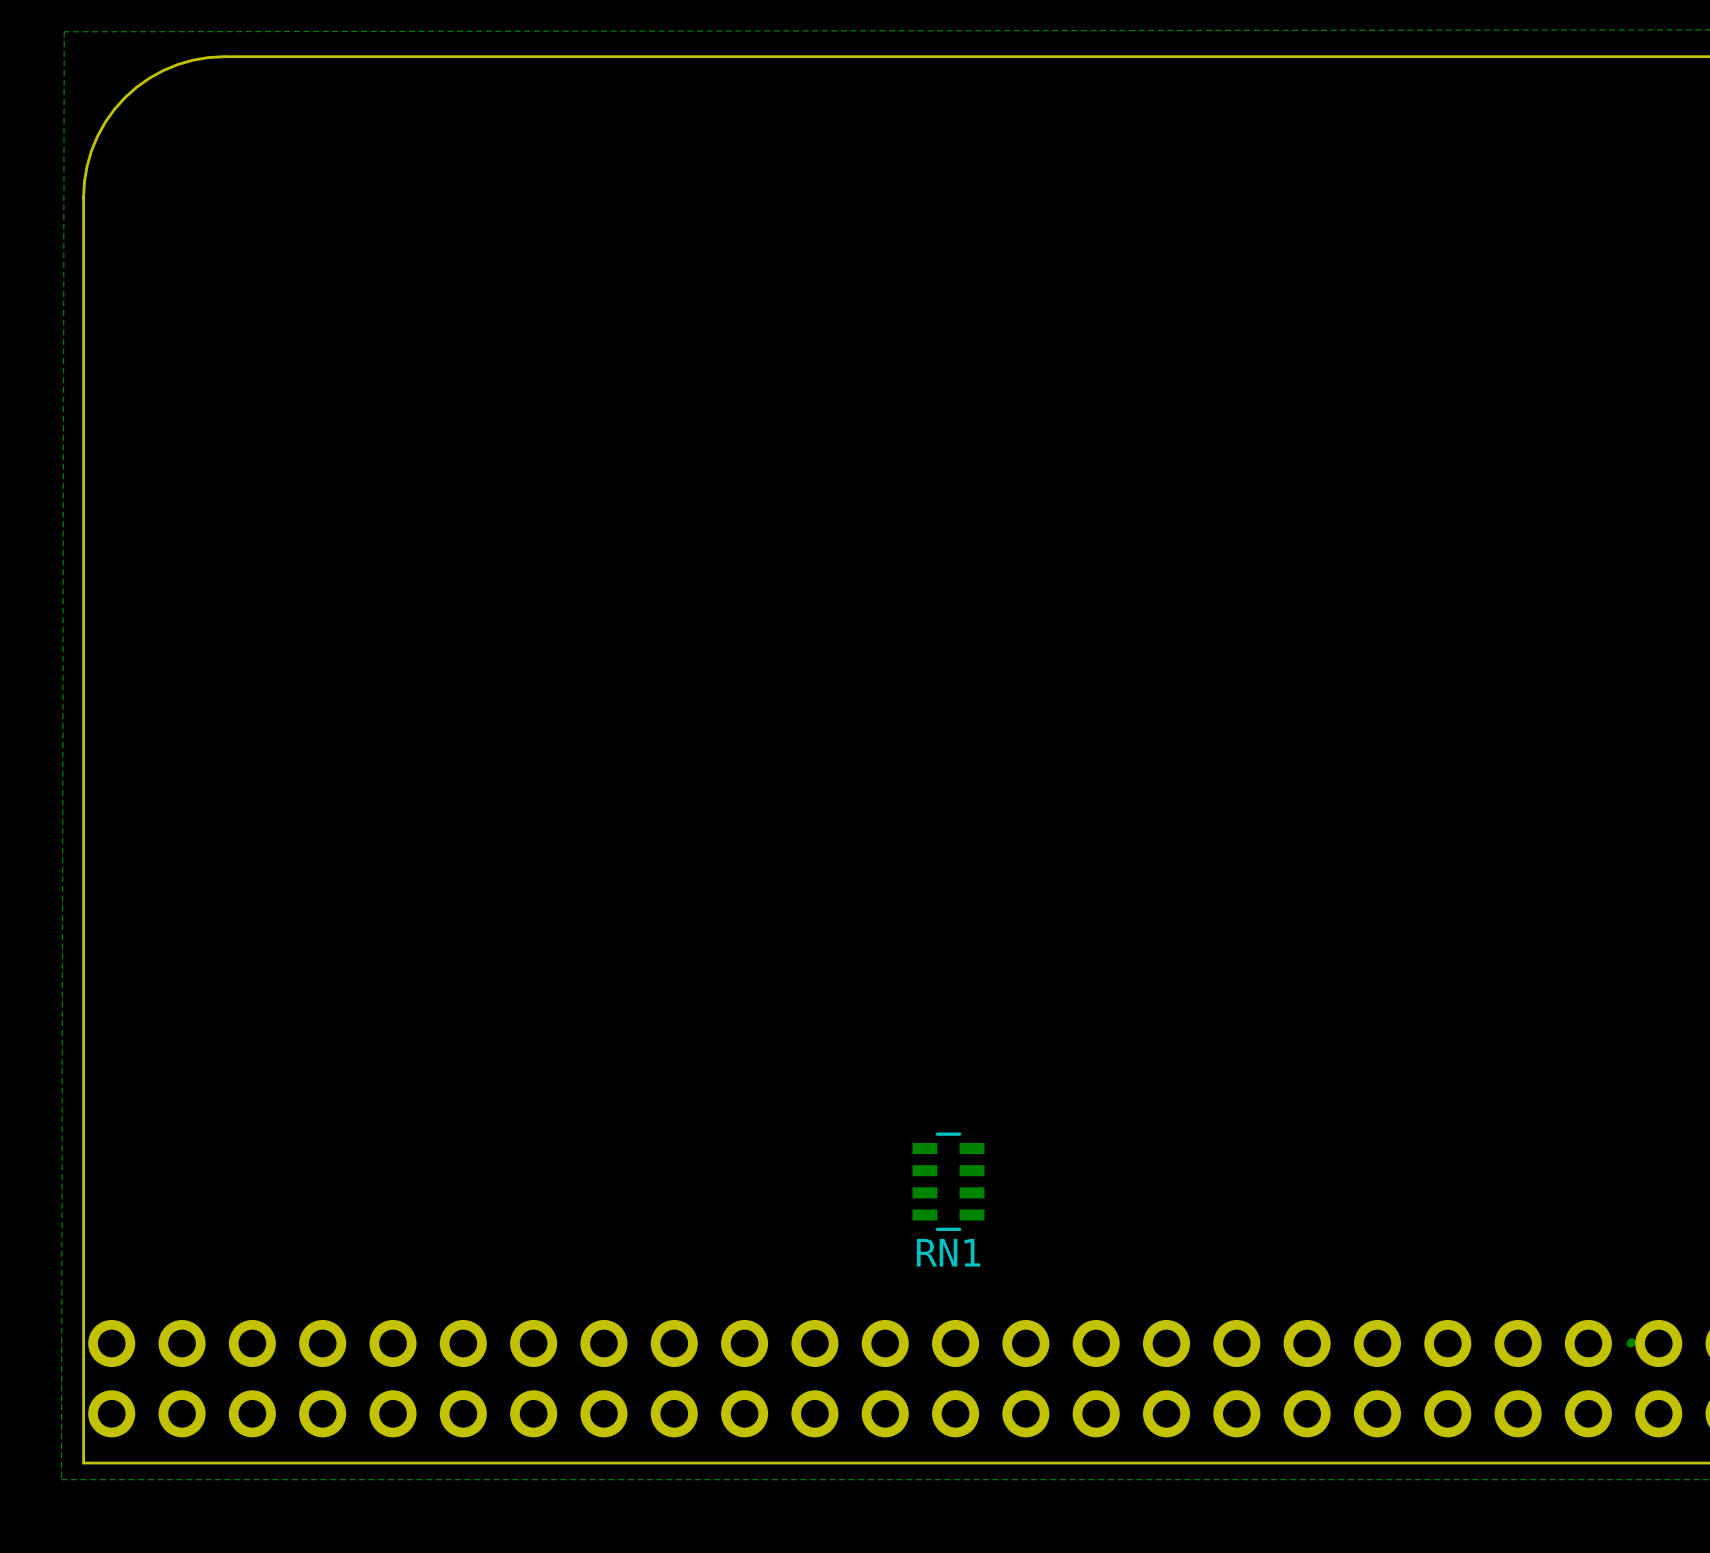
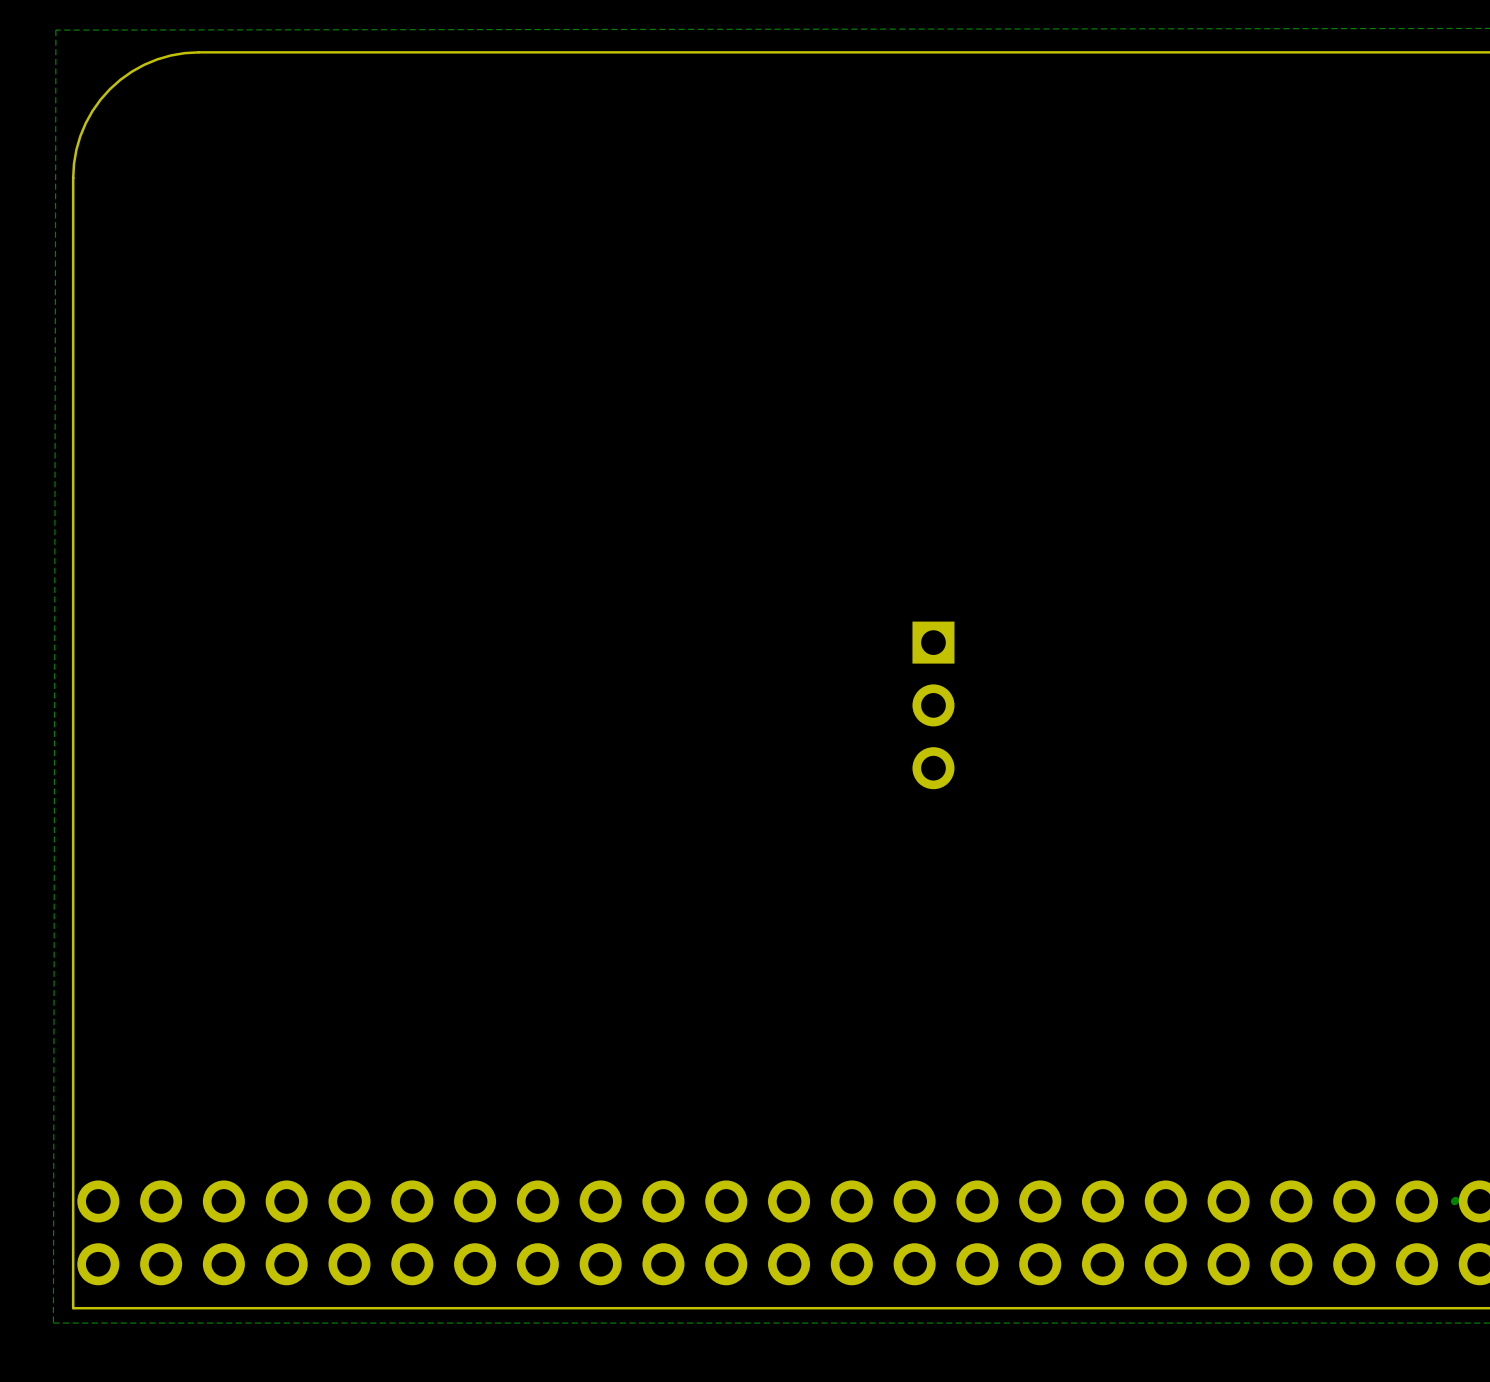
part: none -> (933, 705)
RN1: (948, 1181) -> none

